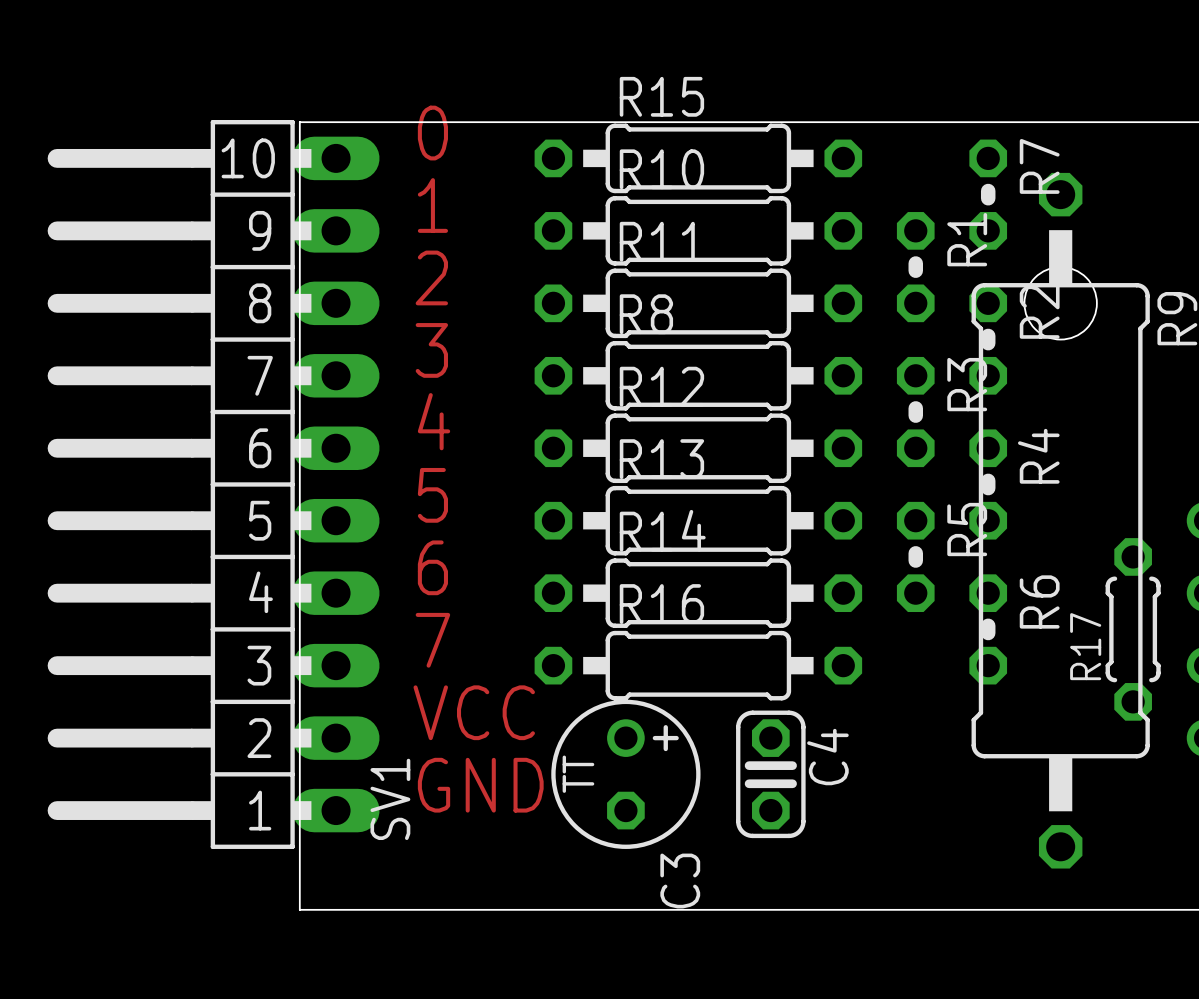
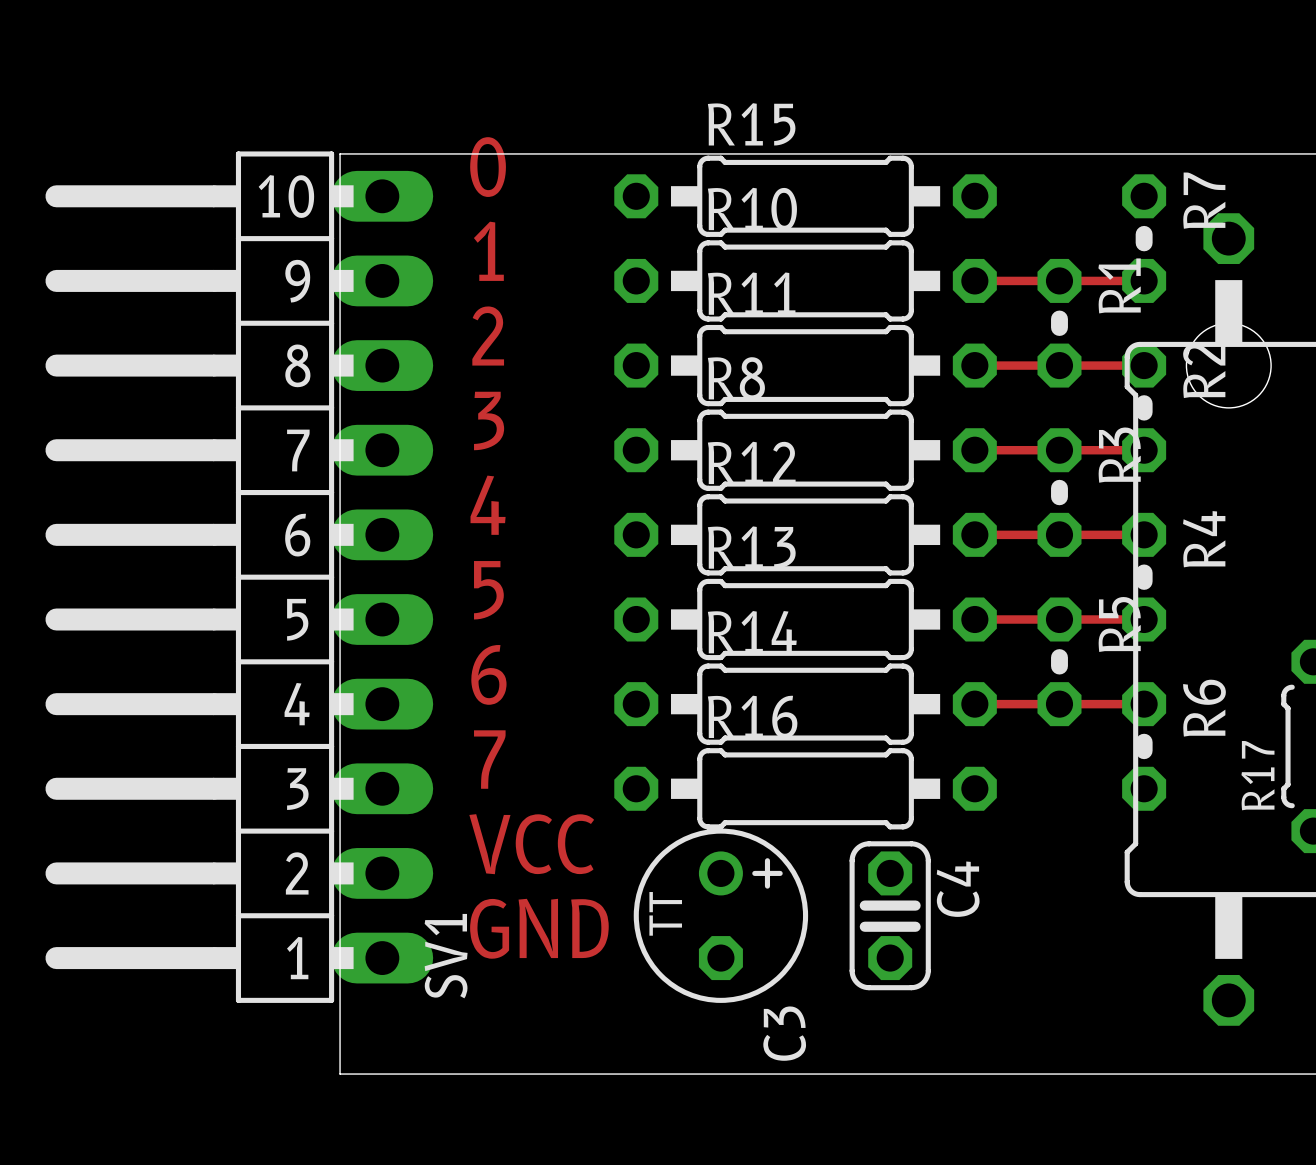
track: none -> (974, 280) (1144, 280)
track: none -> (974, 365) (1144, 365)
track: none -> (974, 450) (1144, 450)
track: none -> (974, 534) (1144, 534)
track: none -> (974, 619) (1144, 619)
track: none -> (974, 704) (1144, 704)

